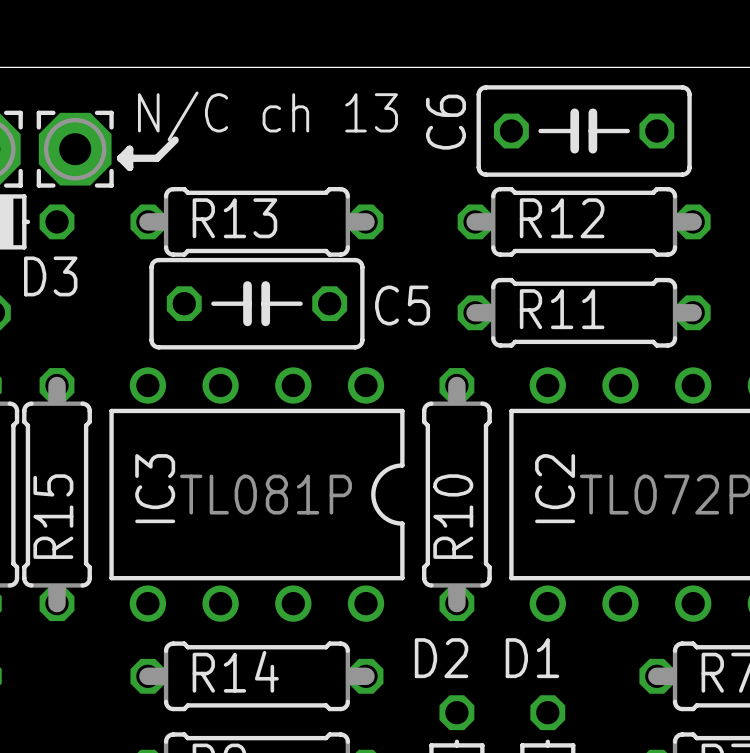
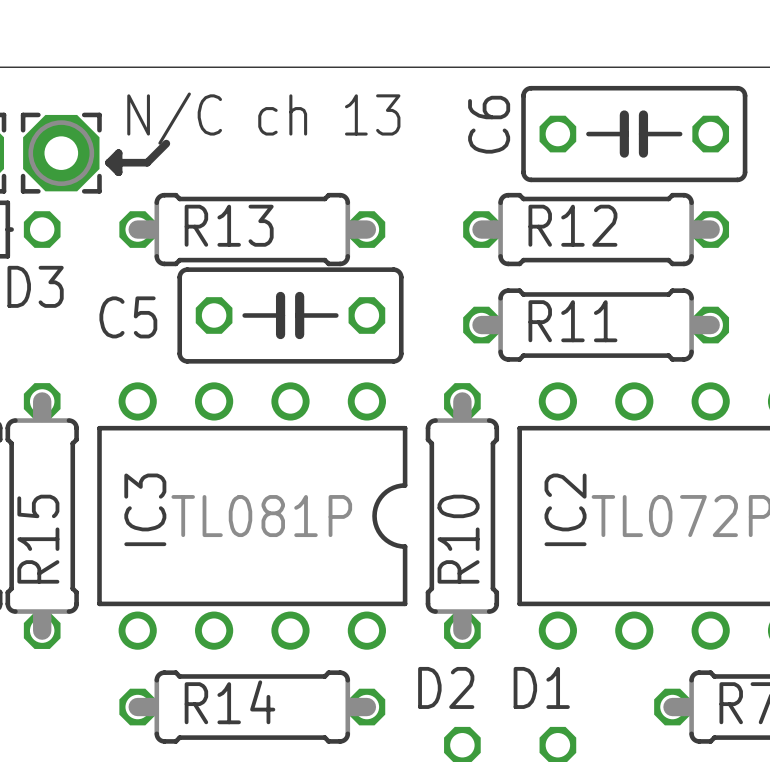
C6 position: (584, 131) -> (634, 134)
C5 position: (256, 303) -> (290, 315)
C5 name position: C5 (402, 305) -> C5 (128, 317)

